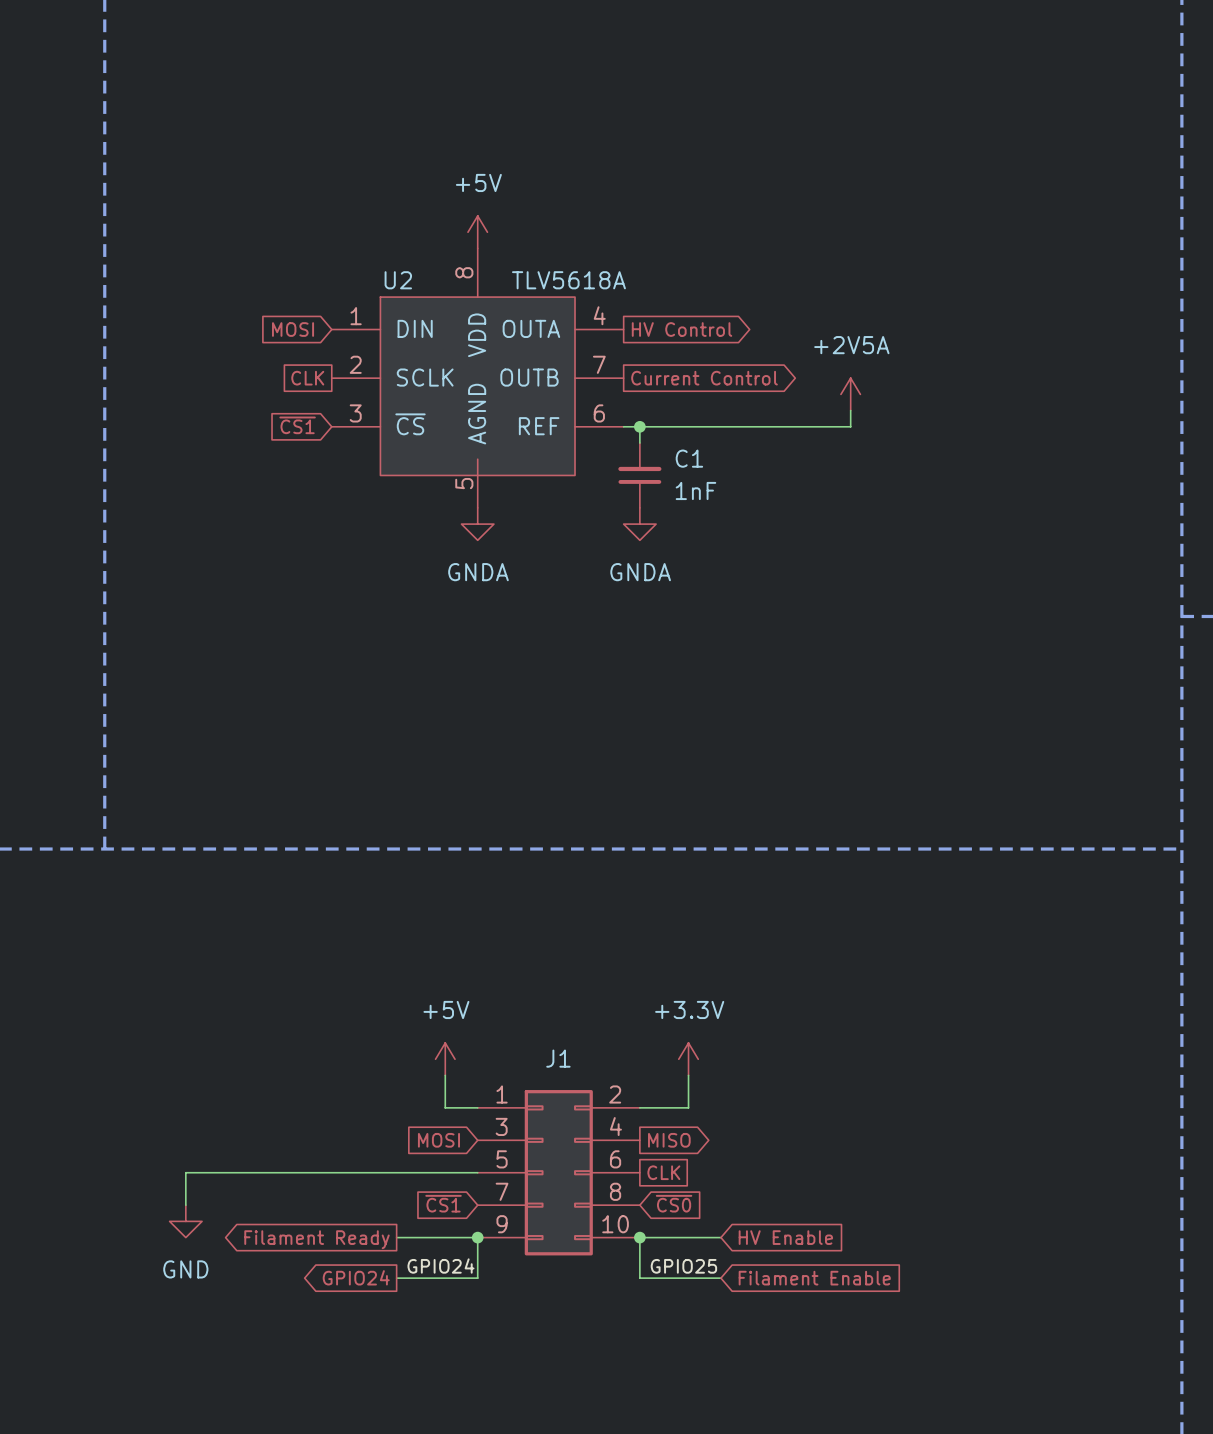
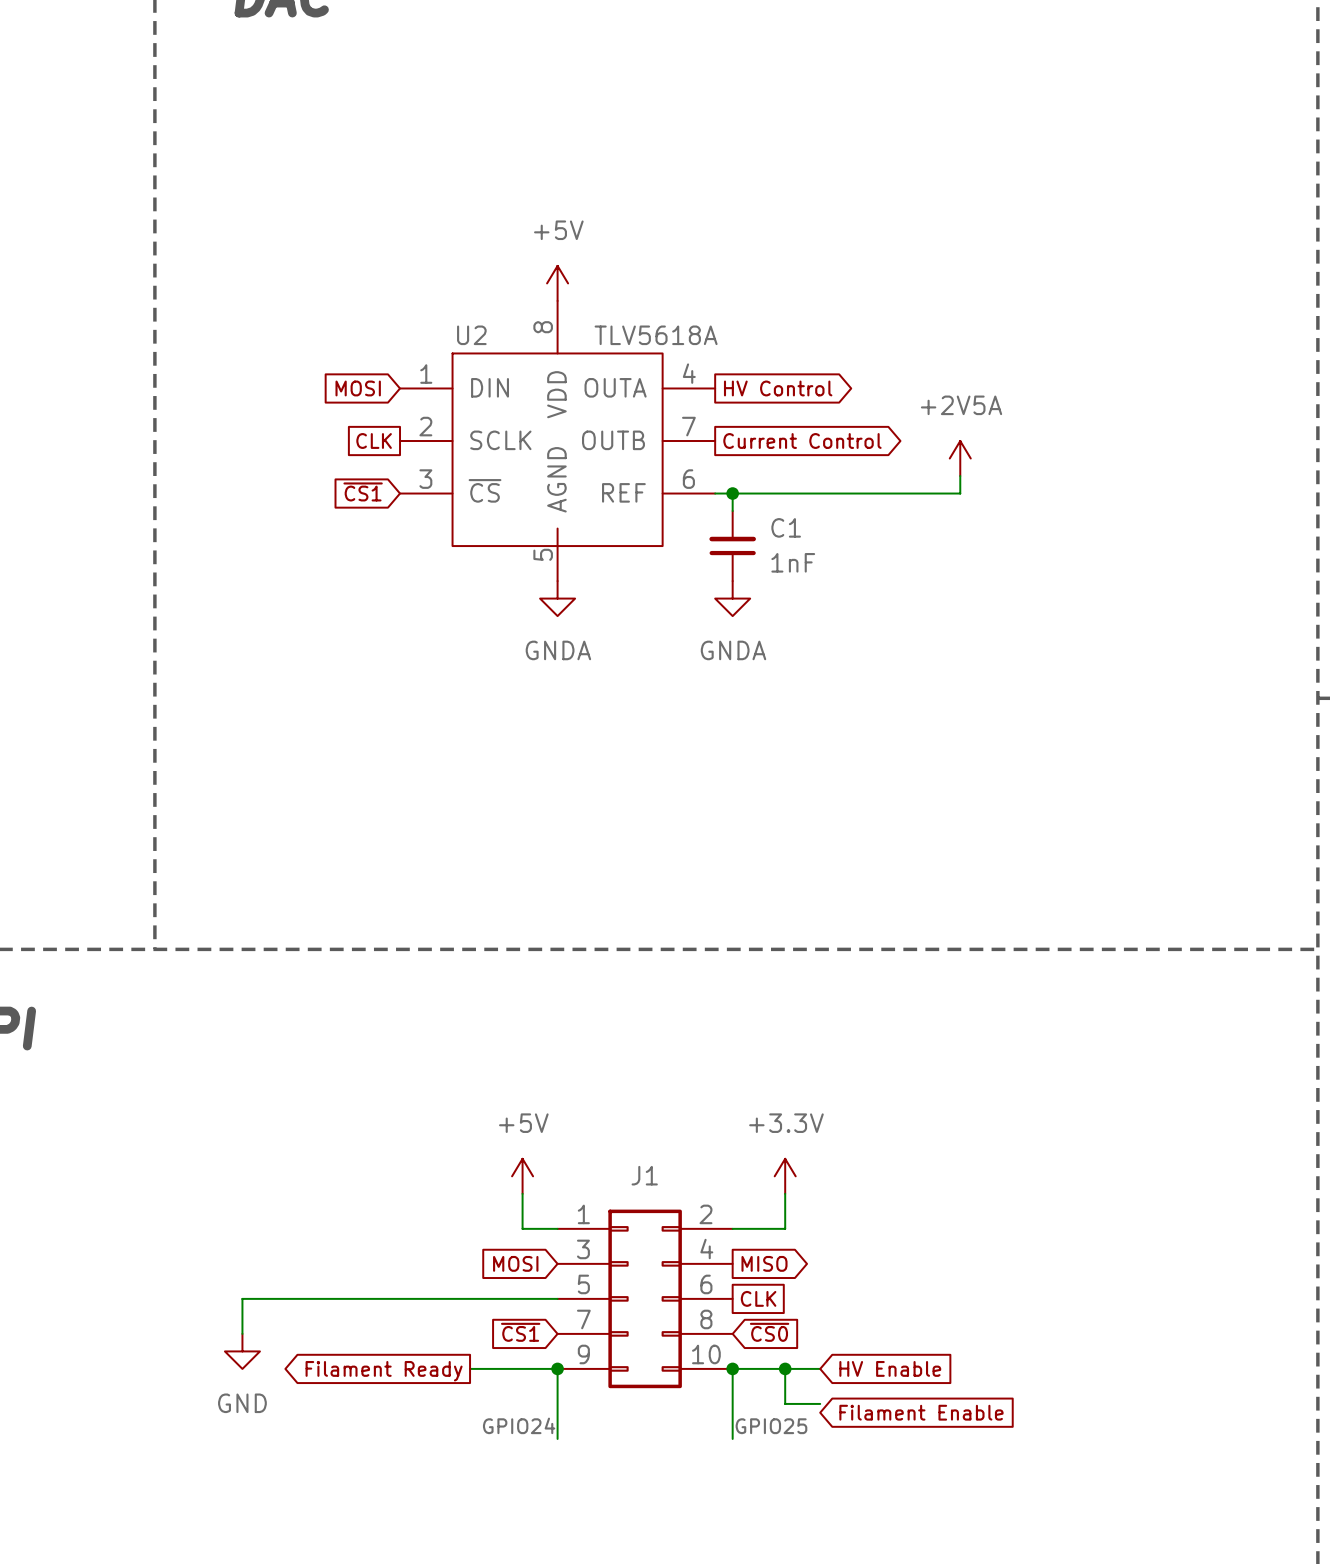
wire: none -> (785, 1368) (785, 1403) (820, 1403)
junction: none -> (785, 1368)
label position: GPIO24 (440, 1266) -> GPIO24 (519, 1425)
label position: GPIO25 (683, 1266) -> GPIO25 (771, 1426)
global label: GPIO24 (356, 1277) -> none
wire: (396, 1278) (477, 1278) -> (557, 1438) (557, 1412)
wire: (639, 1278) (720, 1278) -> (732, 1412) (732, 1438)

